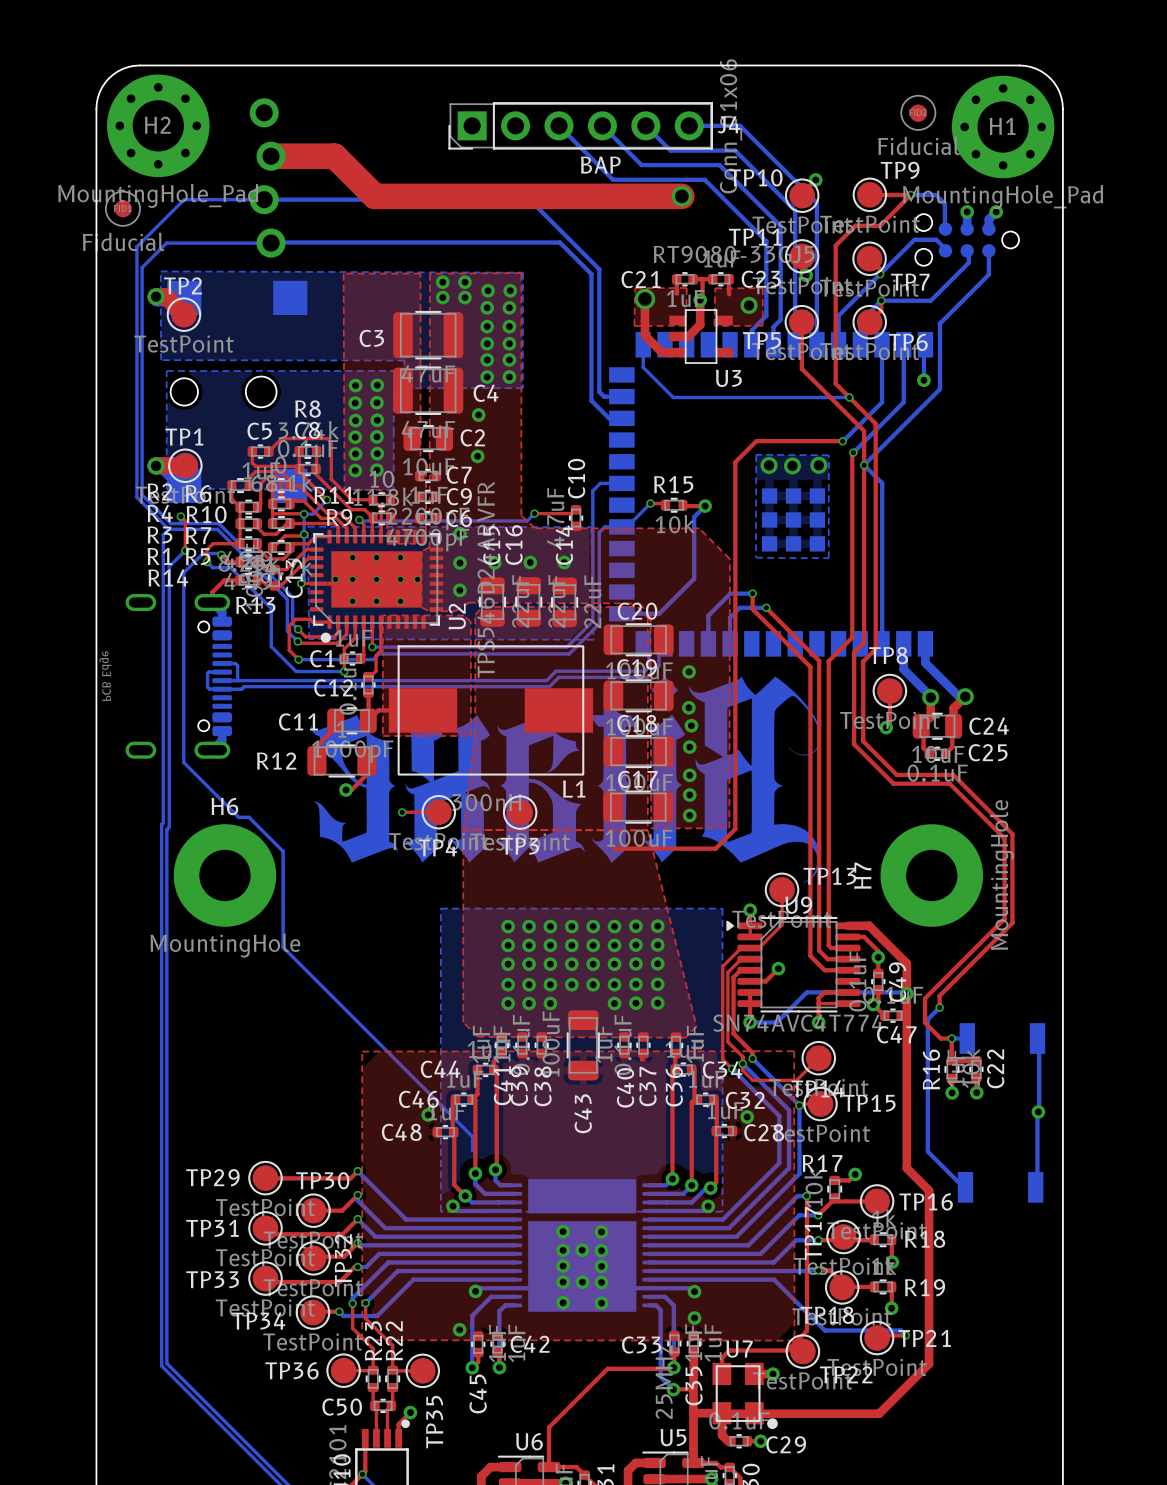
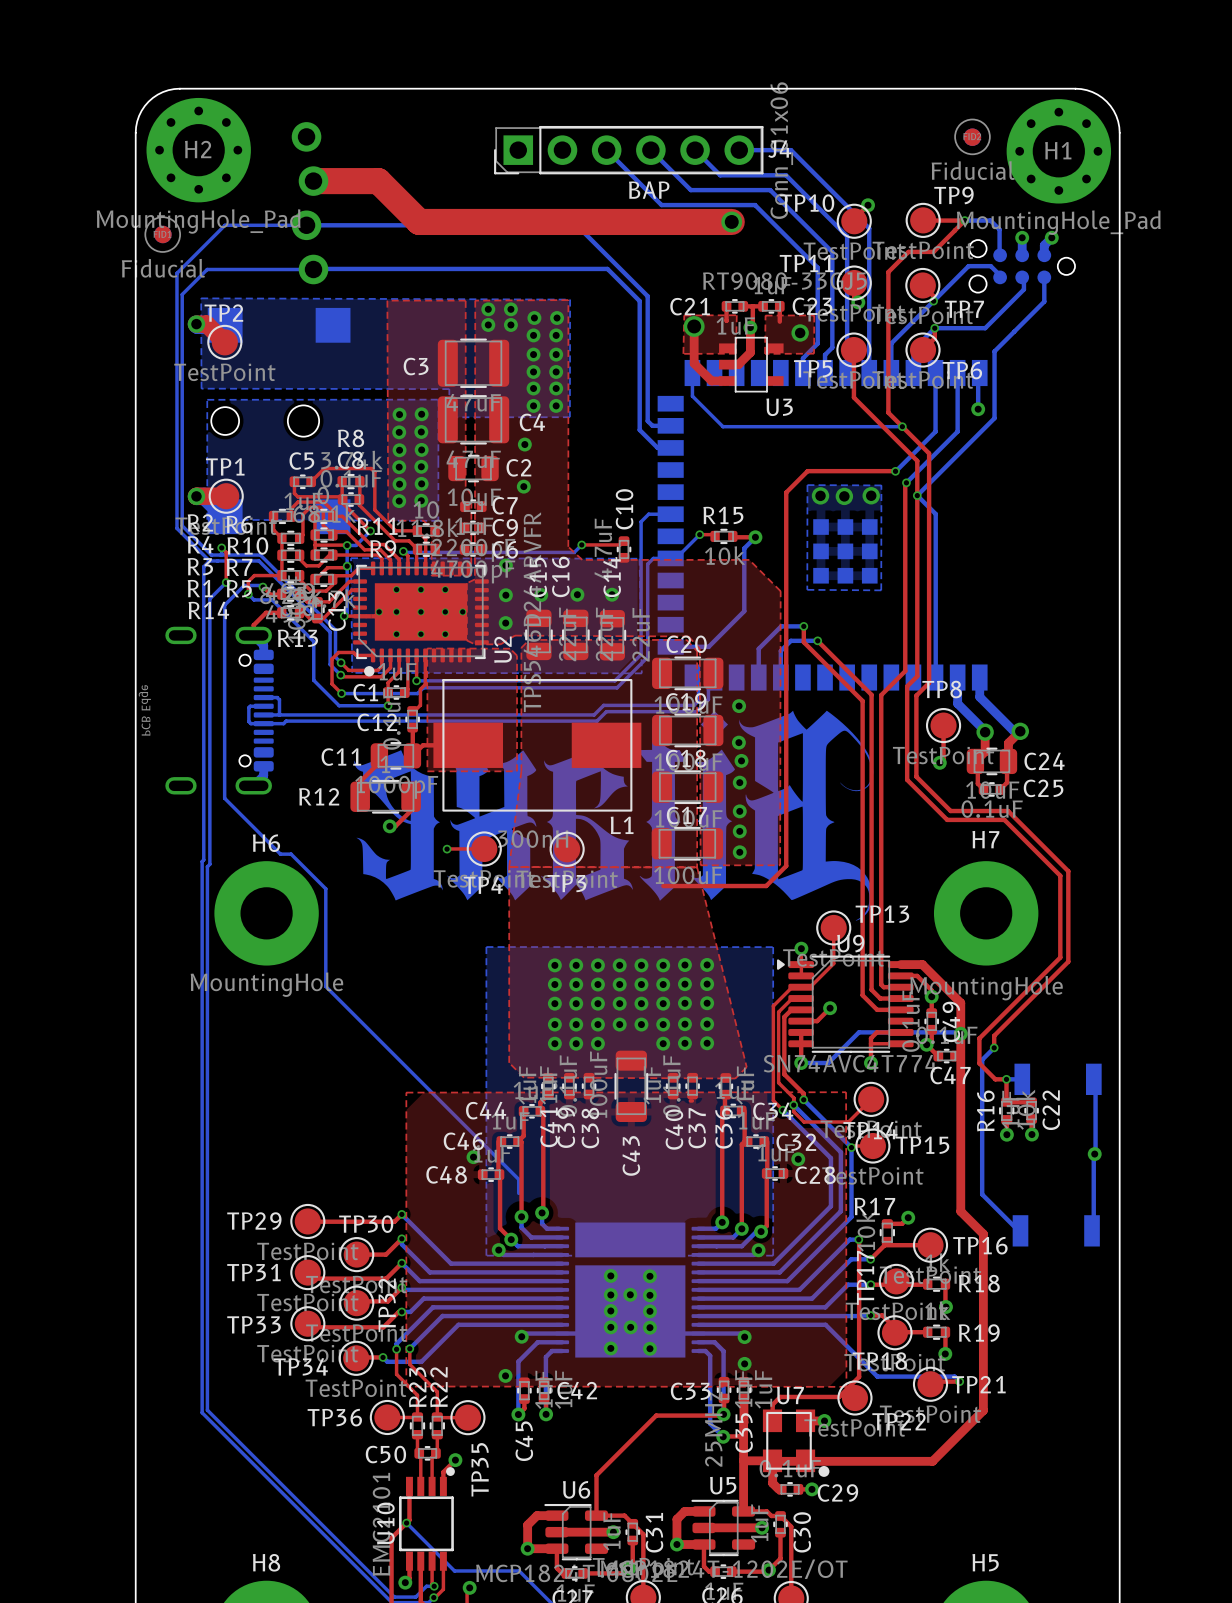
H7 name rotation: 0° (862, 875) -> 90° clockwise (985, 839)
H7 name position: H7 (862, 875) -> H7 (985, 839)
H7 value rotation: 0° (1001, 875) -> 90° clockwise (986, 988)

